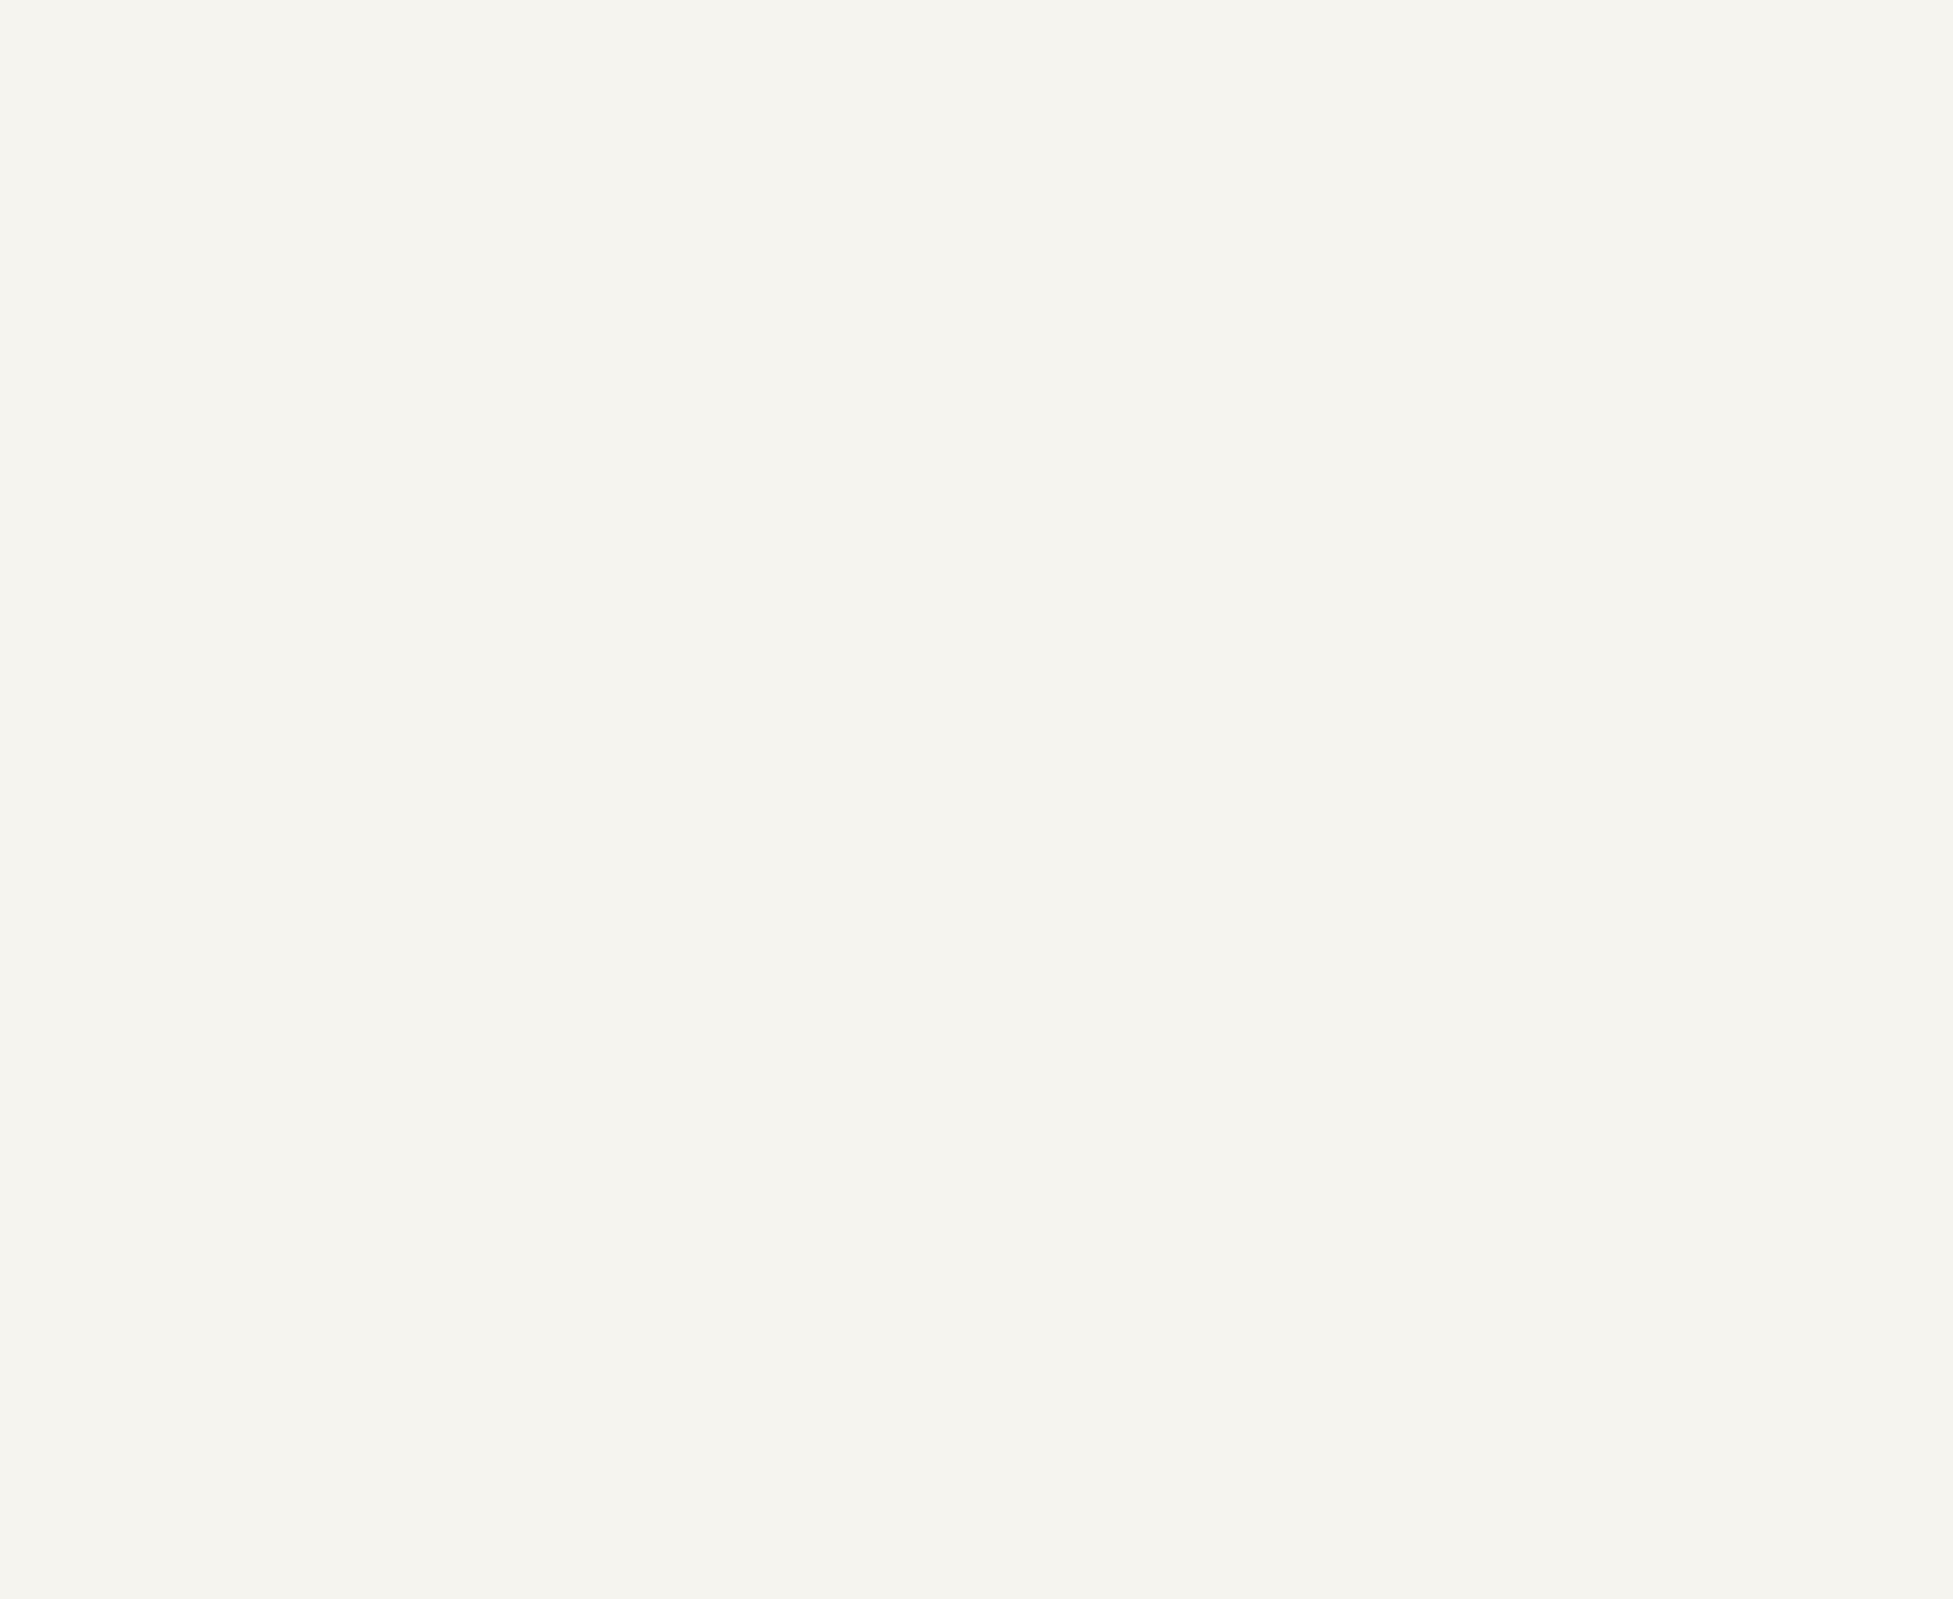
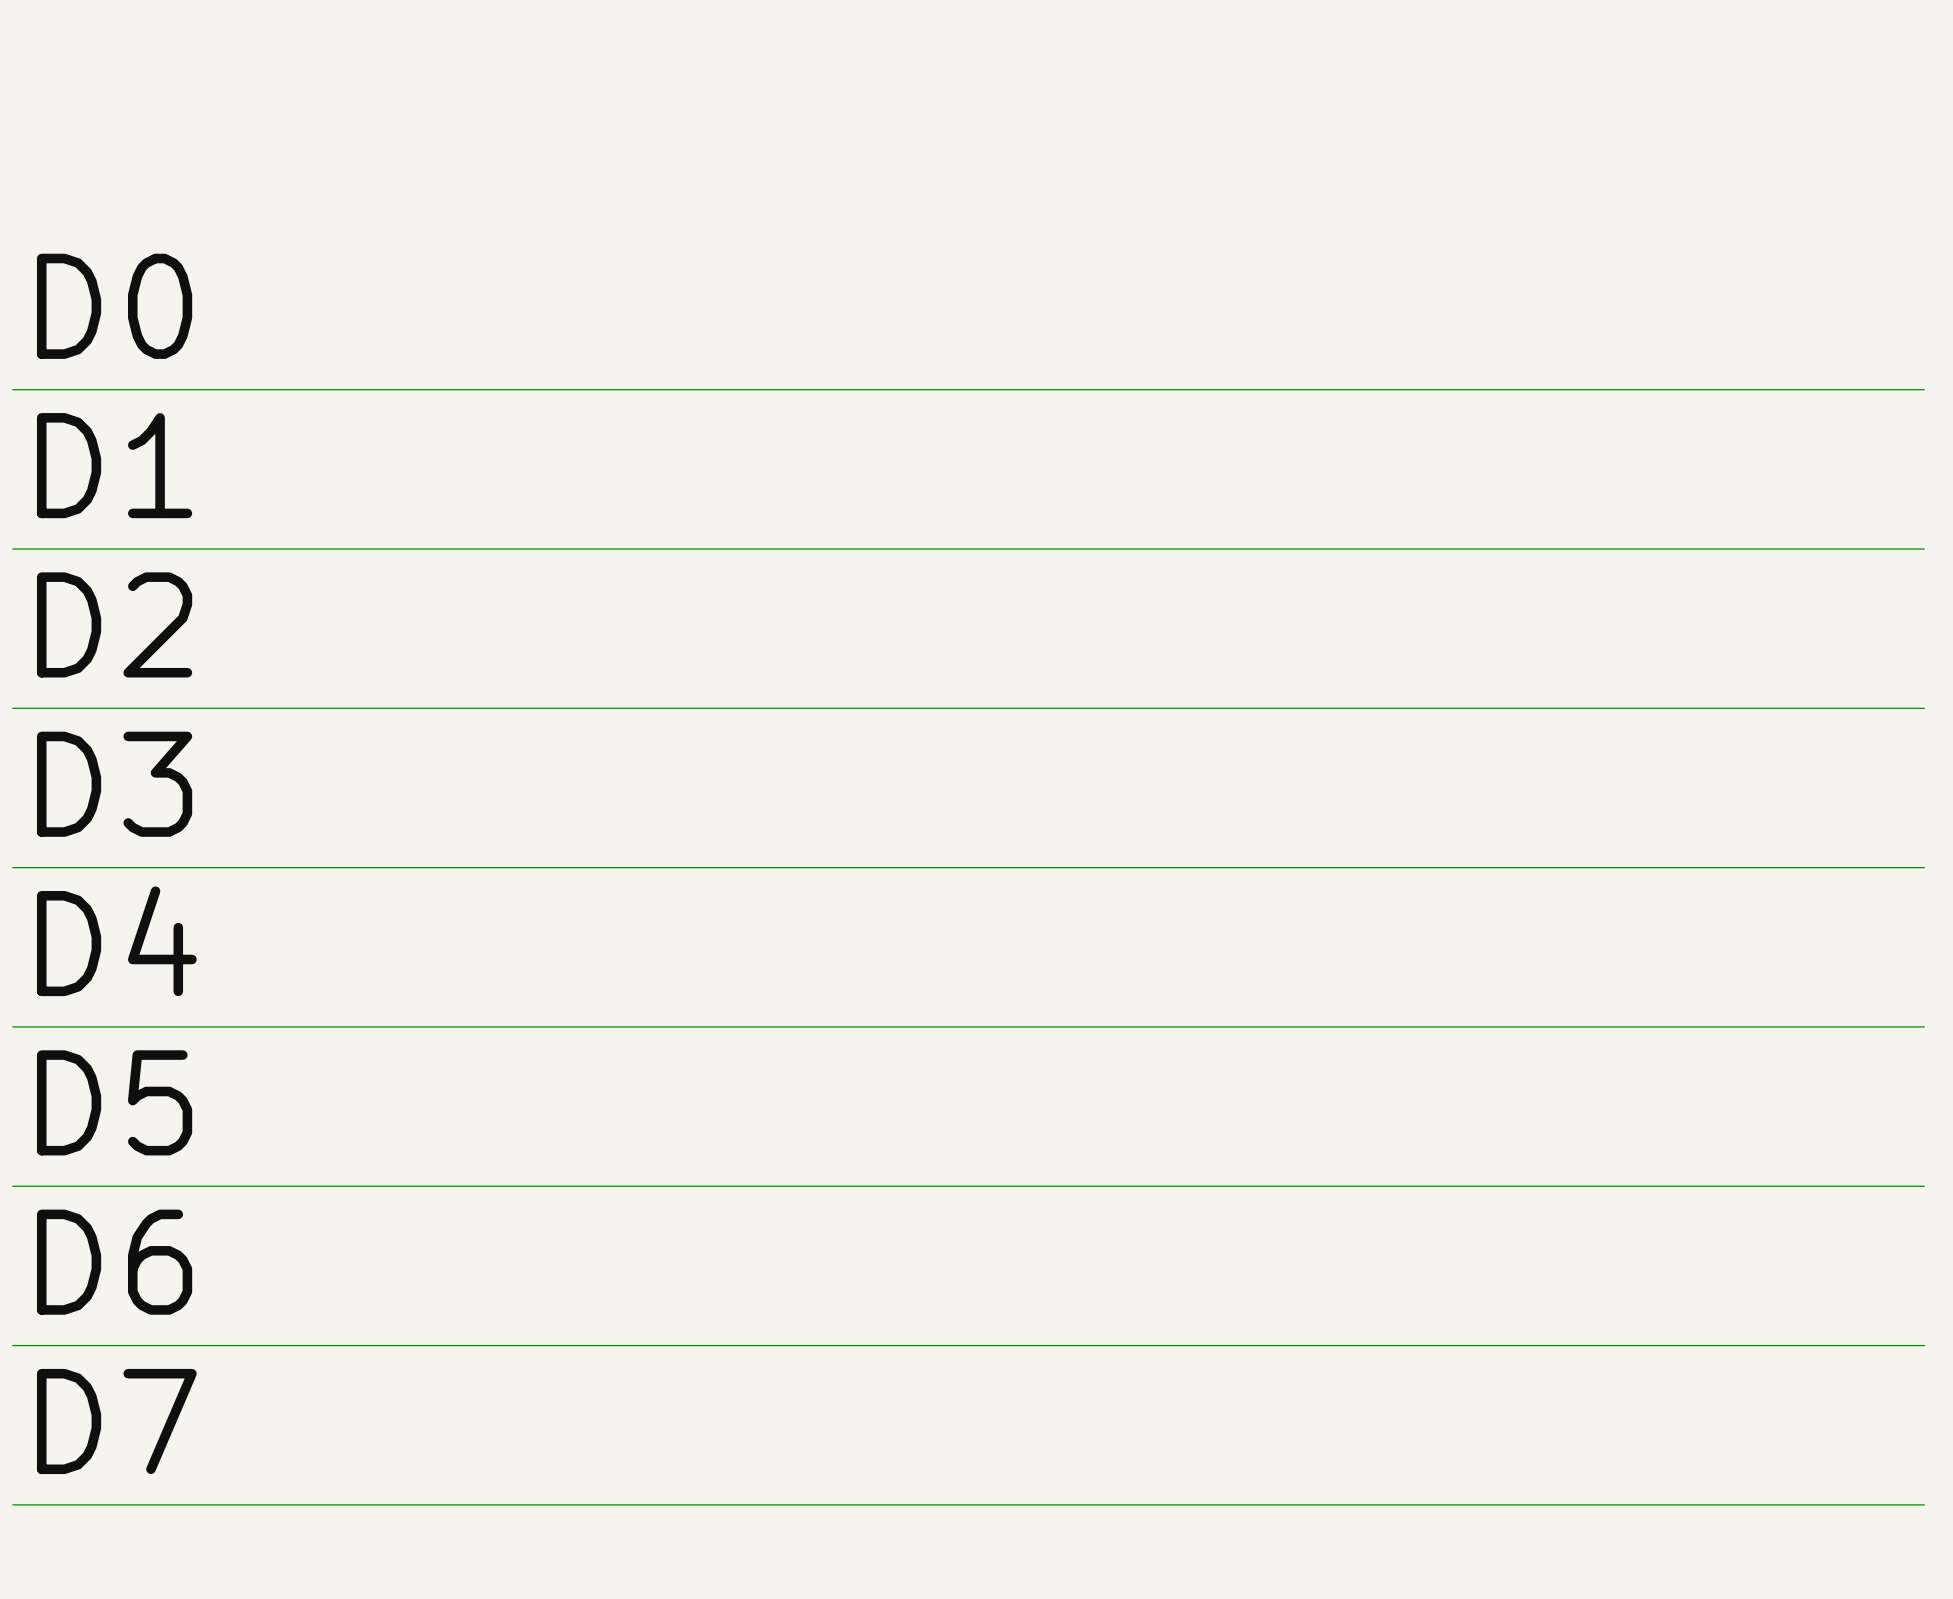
label: none -> D0 (114, 306)
wire: none -> (12, 389) (1924, 389)
label: none -> D1 (114, 465)
wire: none -> (12, 549) (1924, 549)
label: none -> D2 (114, 624)
wire: none -> (12, 708) (1924, 708)
label: none -> D3 (114, 784)
wire: none -> (12, 867) (1924, 867)
label: none -> D4 (116, 941)
wire: none -> (12, 1026) (1924, 1026)
label: none -> D5 (114, 1102)
wire: none -> (12, 1186) (1924, 1186)
label: none -> D6 (114, 1262)
wire: none -> (12, 1345) (1924, 1345)
label: none -> D7 (116, 1421)
wire: none -> (12, 1504) (1924, 1504)

